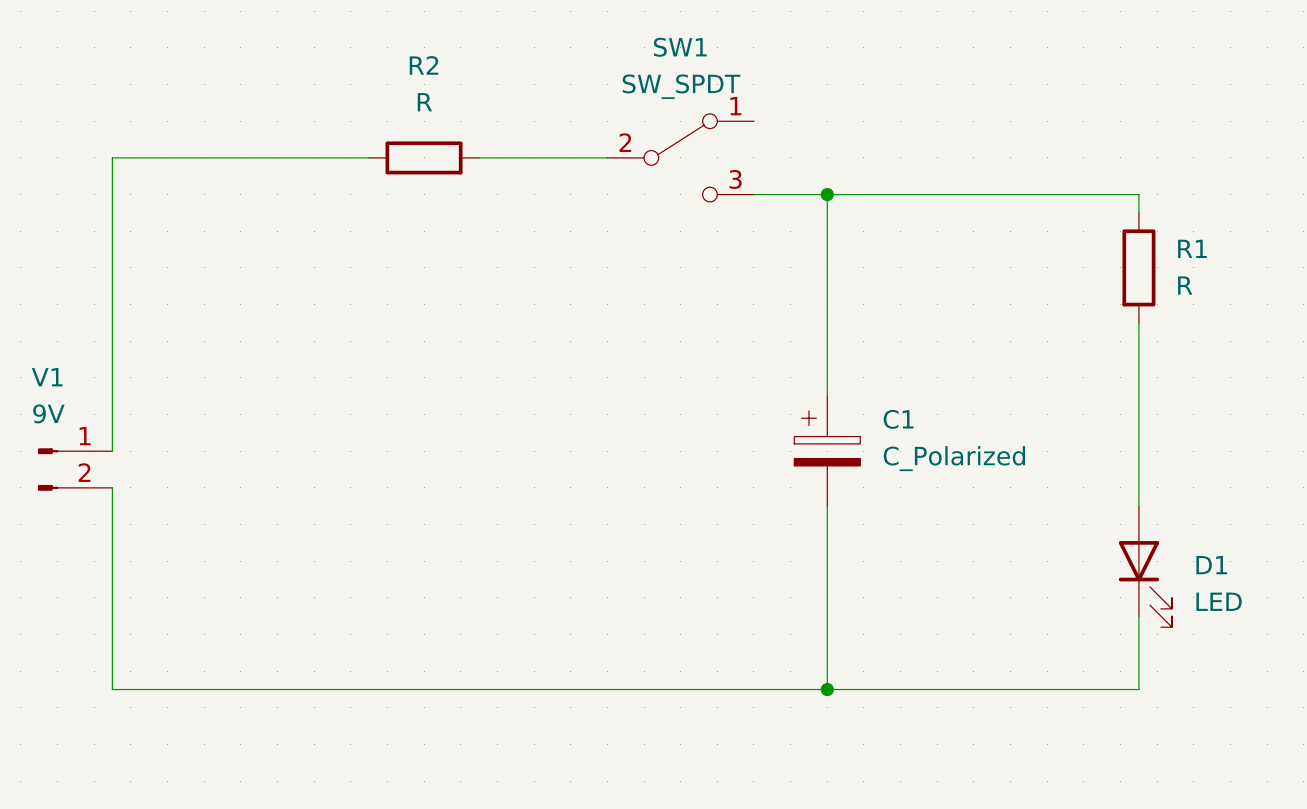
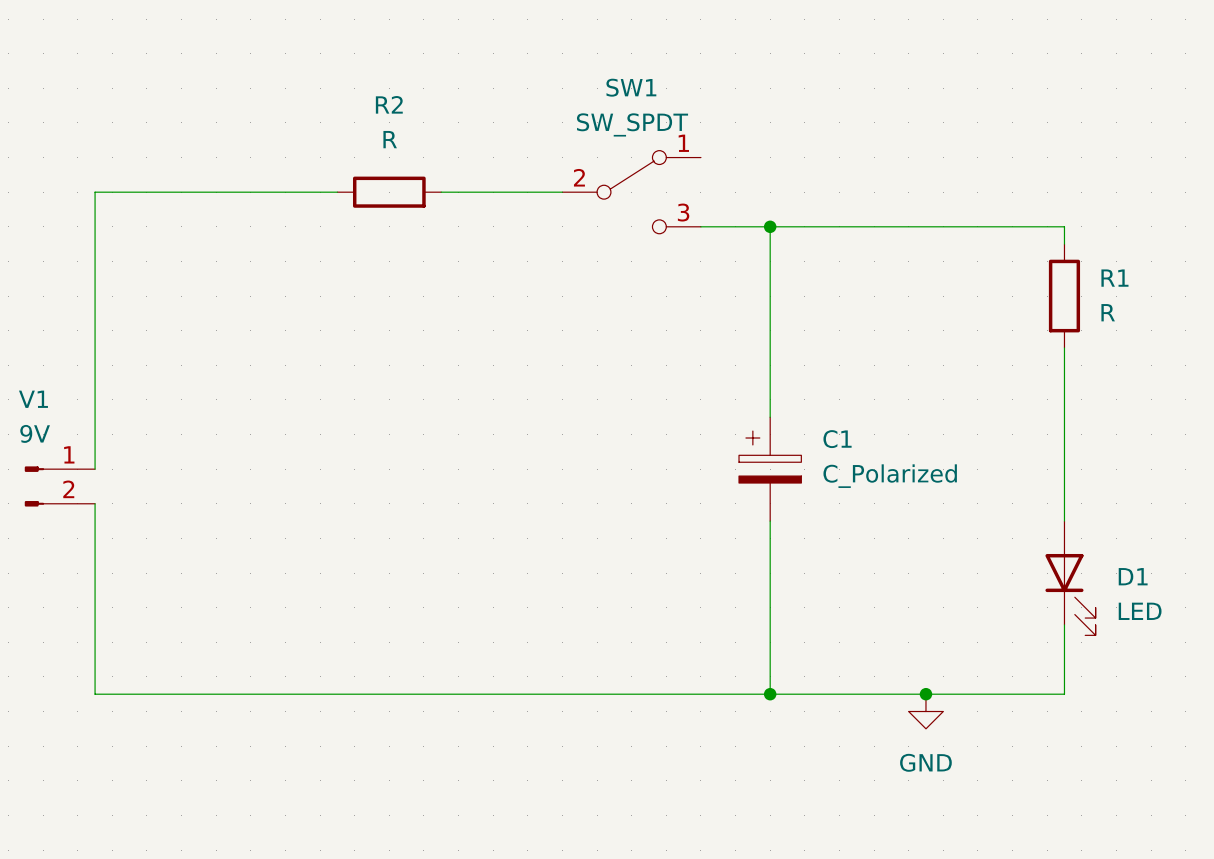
junction: none -> (925, 694)
power symbol: none -> GND (925, 711)

